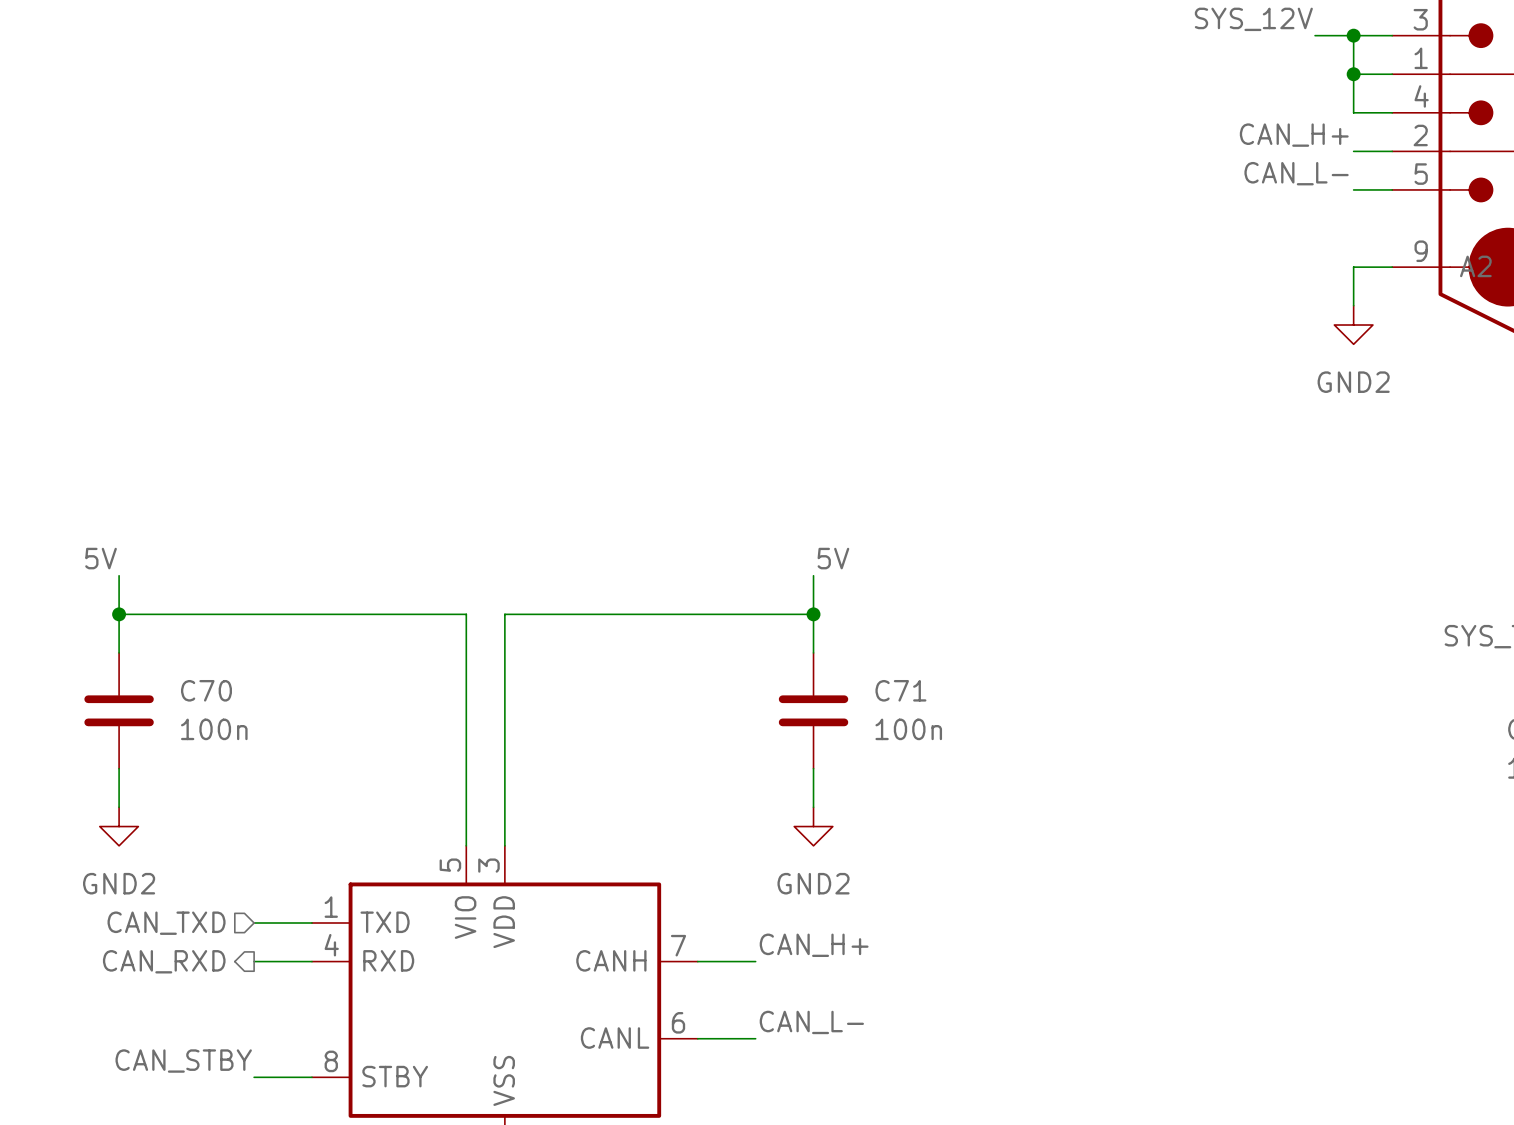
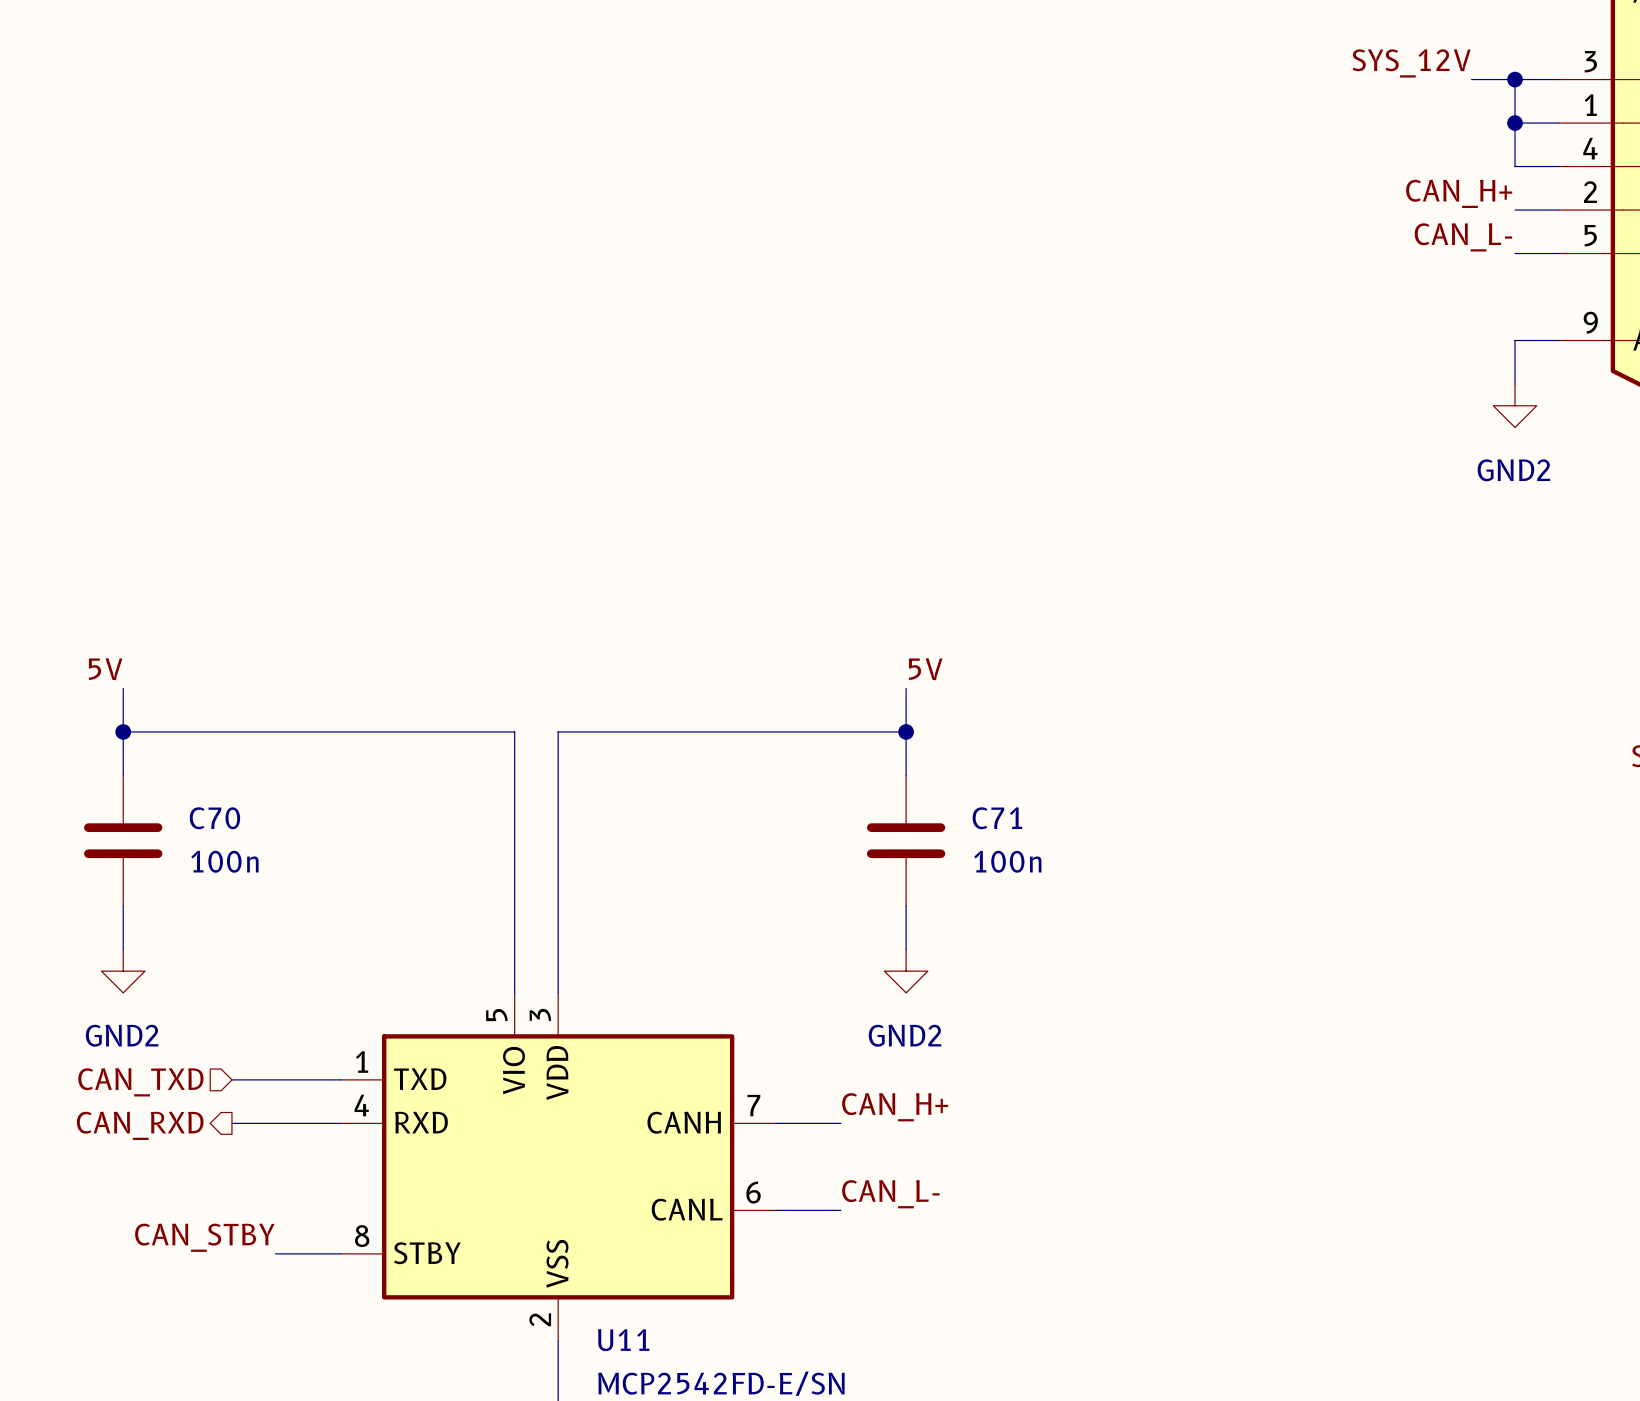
hierarchical label position: CAN_TXD (166, 923) -> CAN_TXD (140, 1082)
wire: none -> (231, 1079) (275, 1079)
hierarchical label position: CAN_RXD (164, 961) -> CAN_RXD (140, 1125)
wire: none -> (231, 1123) (275, 1123)

